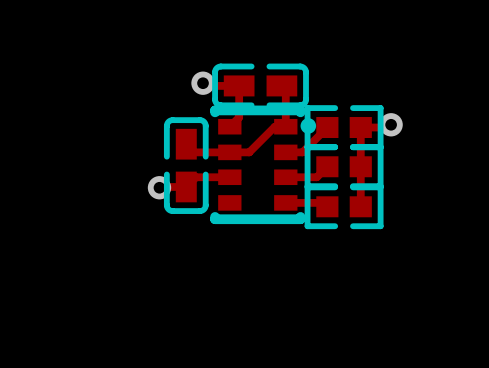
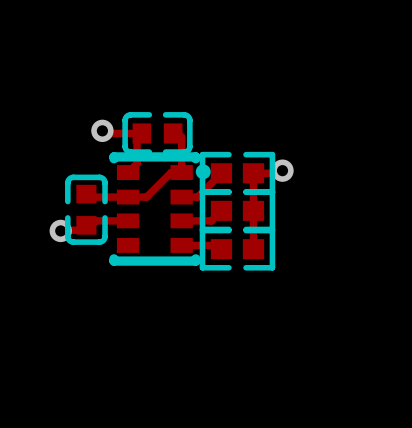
part footprint: [212, 63, 309, 109] -> [122, 112, 193, 155]
part footprint: [163, 117, 209, 214] -> [65, 174, 108, 245]

